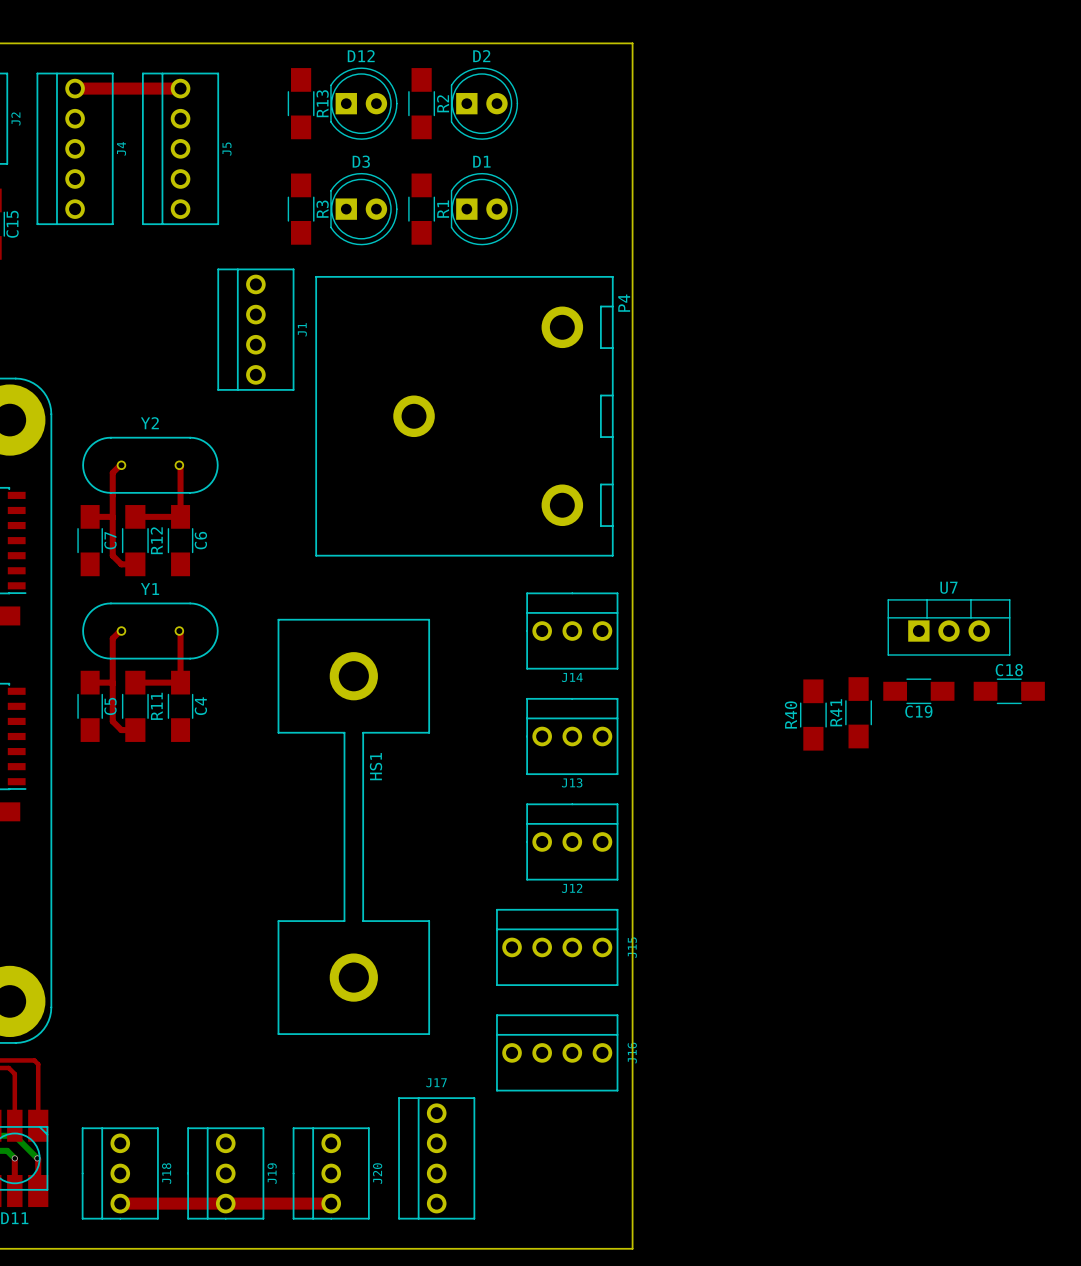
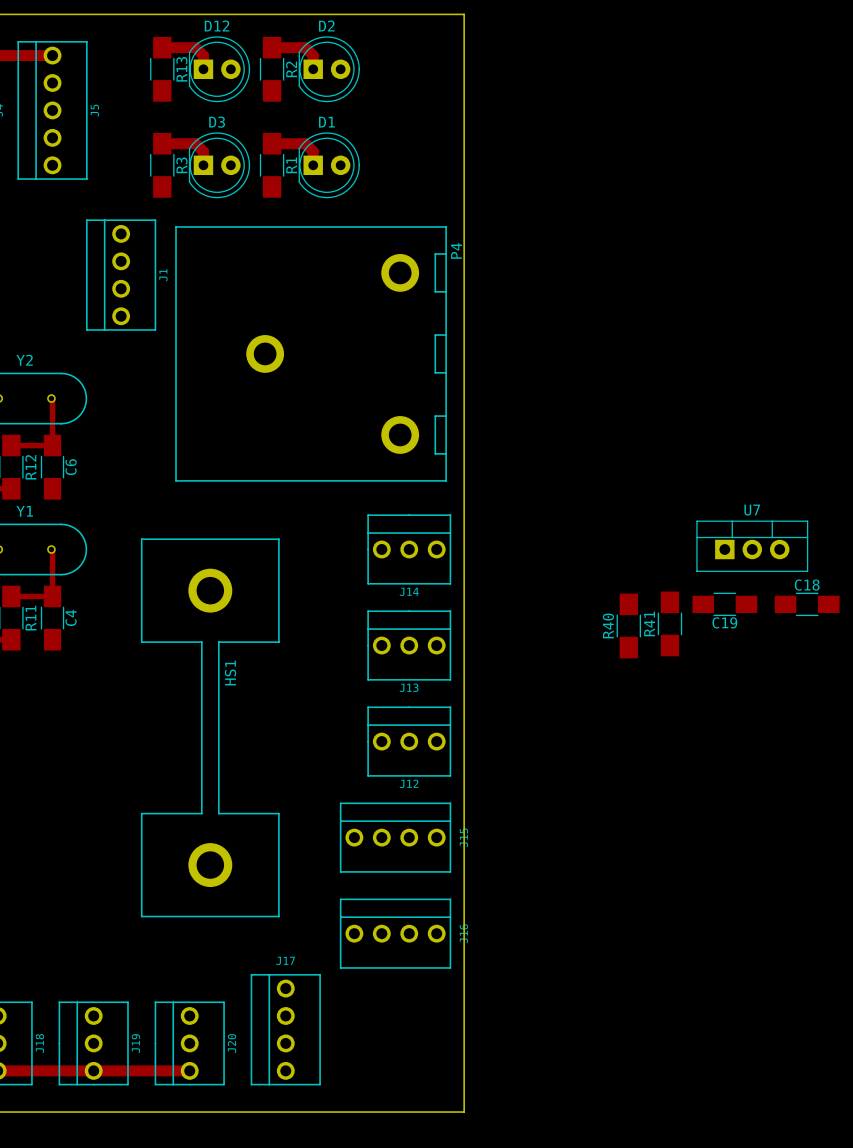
top track: none -> (162, 47) (195, 47) (203, 55) (203, 69)
top track: none -> (272, 47) (305, 47) (313, 55) (313, 69)
top track: none -> (162, 143) (195, 143) (203, 151) (203, 165)
top track: none -> (272, 143) (305, 143) (313, 151) (313, 165)

